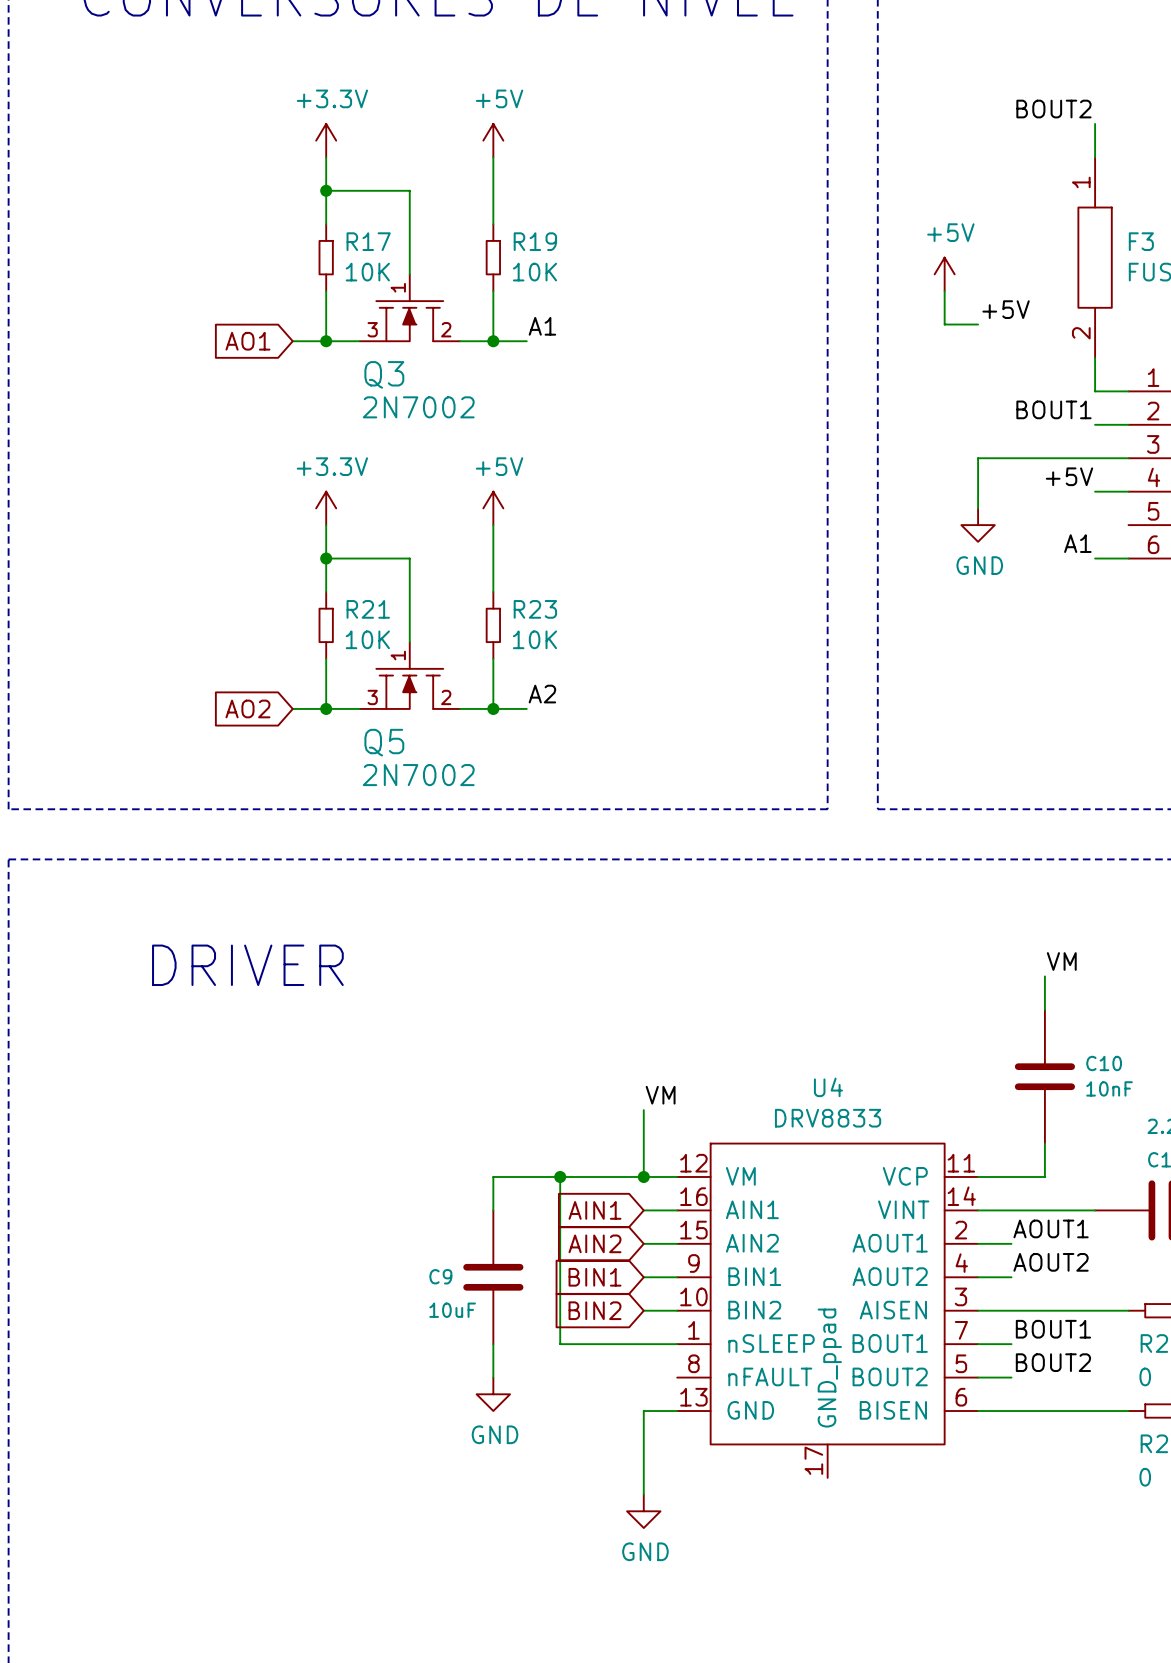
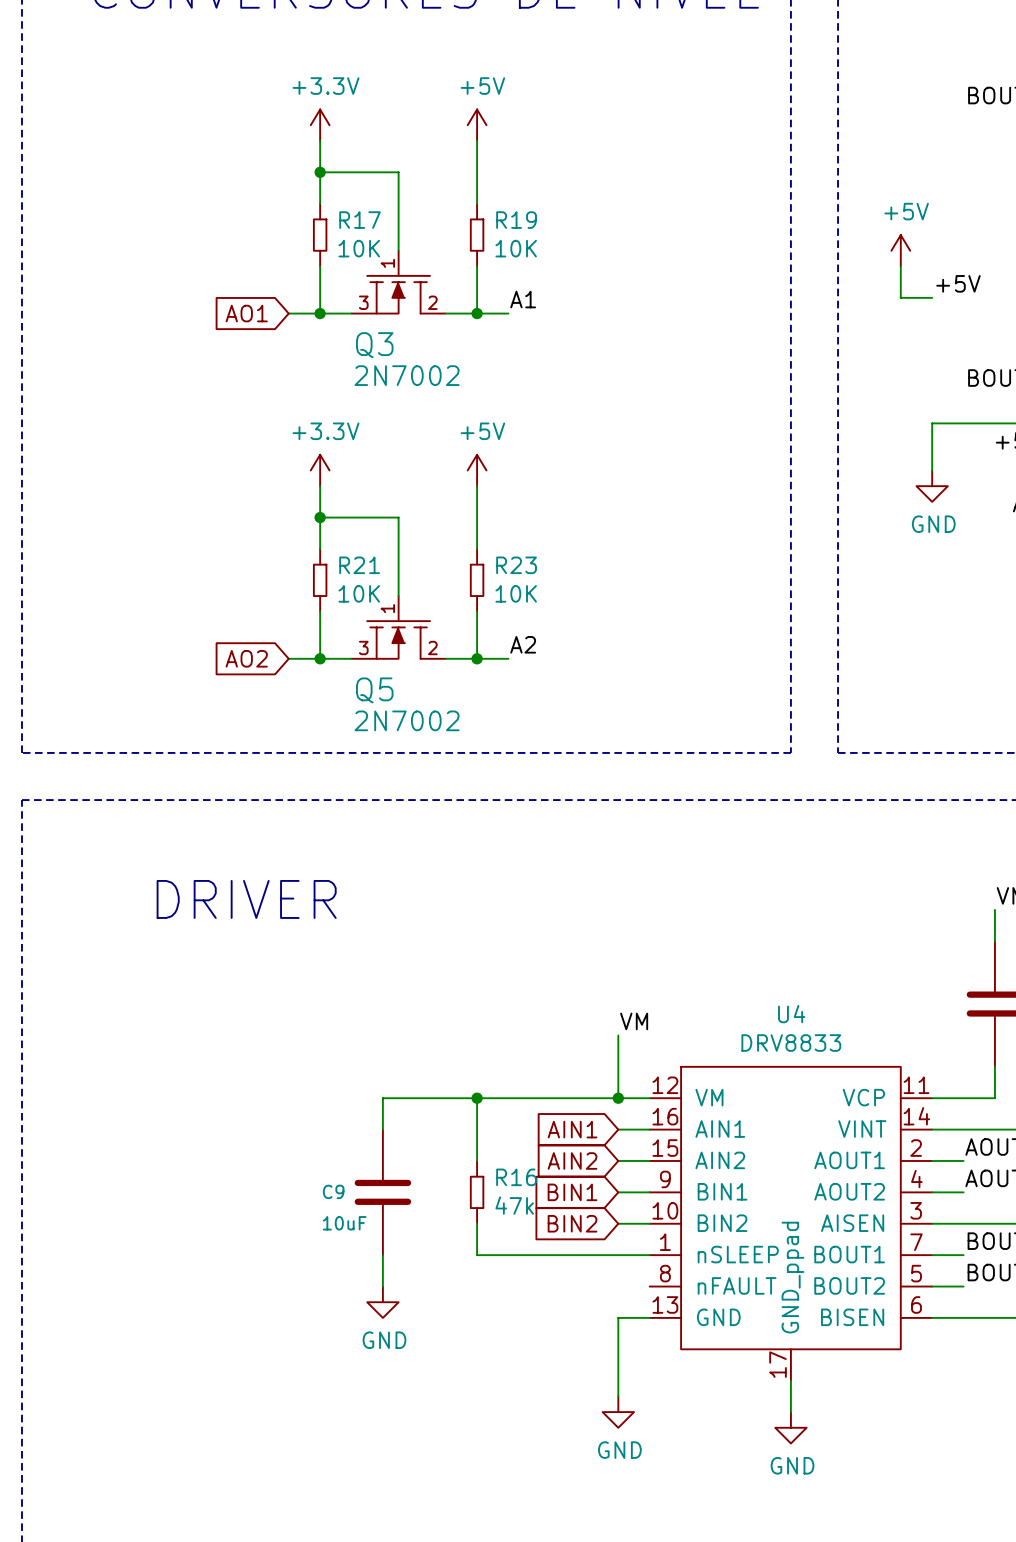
wire: none -> (477, 1098) (382, 1098) (382, 1129)
wire: (560, 1176) (560, 1344) -> (477, 1223) (477, 1255) (539, 1255)
junction position: (560, 1176) -> (477, 1098)
C9 position: (493, 1277) -> (382, 1192)
R16: none -> 47k (477, 1192)
wire: (493, 1344) (493, 1377) -> (382, 1255) (382, 1286)
power symbol position: GND (493, 1394) -> GND (382, 1302)
wire: none -> (790, 1380) (790, 1412)
power symbol: none -> GND (790, 1427)

